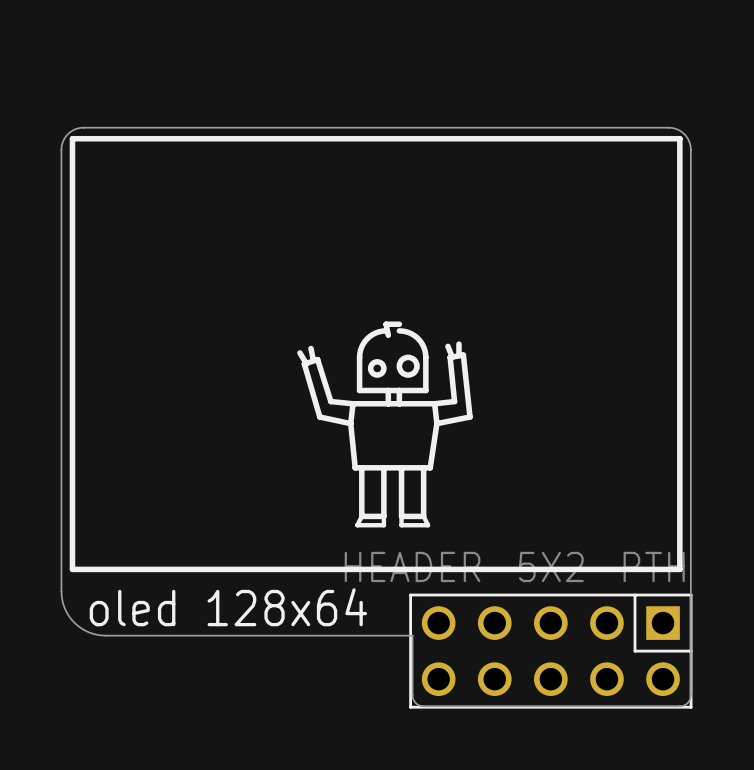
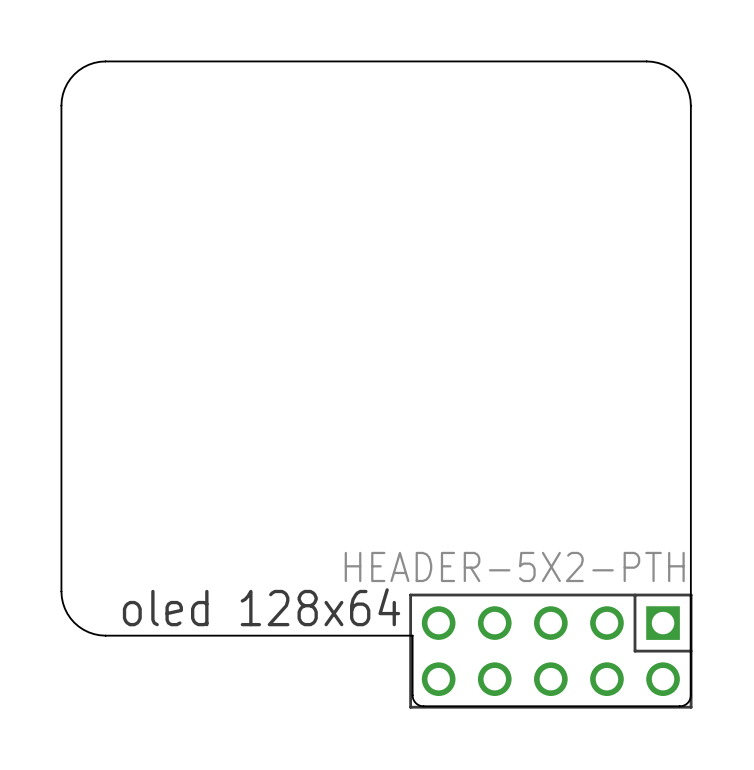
line: (72, 138) (72, 569) (679, 569) (679, 138) (72, 138) -> none
board edge: (61, 149) (63, 141) (67, 134) (75, 129) (83, 127) (668, 127) (677, 129) (684, 134) (689, 141) (690, 149) -> (61, 149) (61, 99) (67, 83) (74, 74) (83, 67) (94, 62) (105, 61) (652, 61) (663, 64) (673, 70) (681, 78) (687, 88) (690, 105) (690, 149)
drawing: [297, 321, 473, 528] -> none
text position: oled 128x64 (228, 607) -> oled 128x64 (261, 607)

